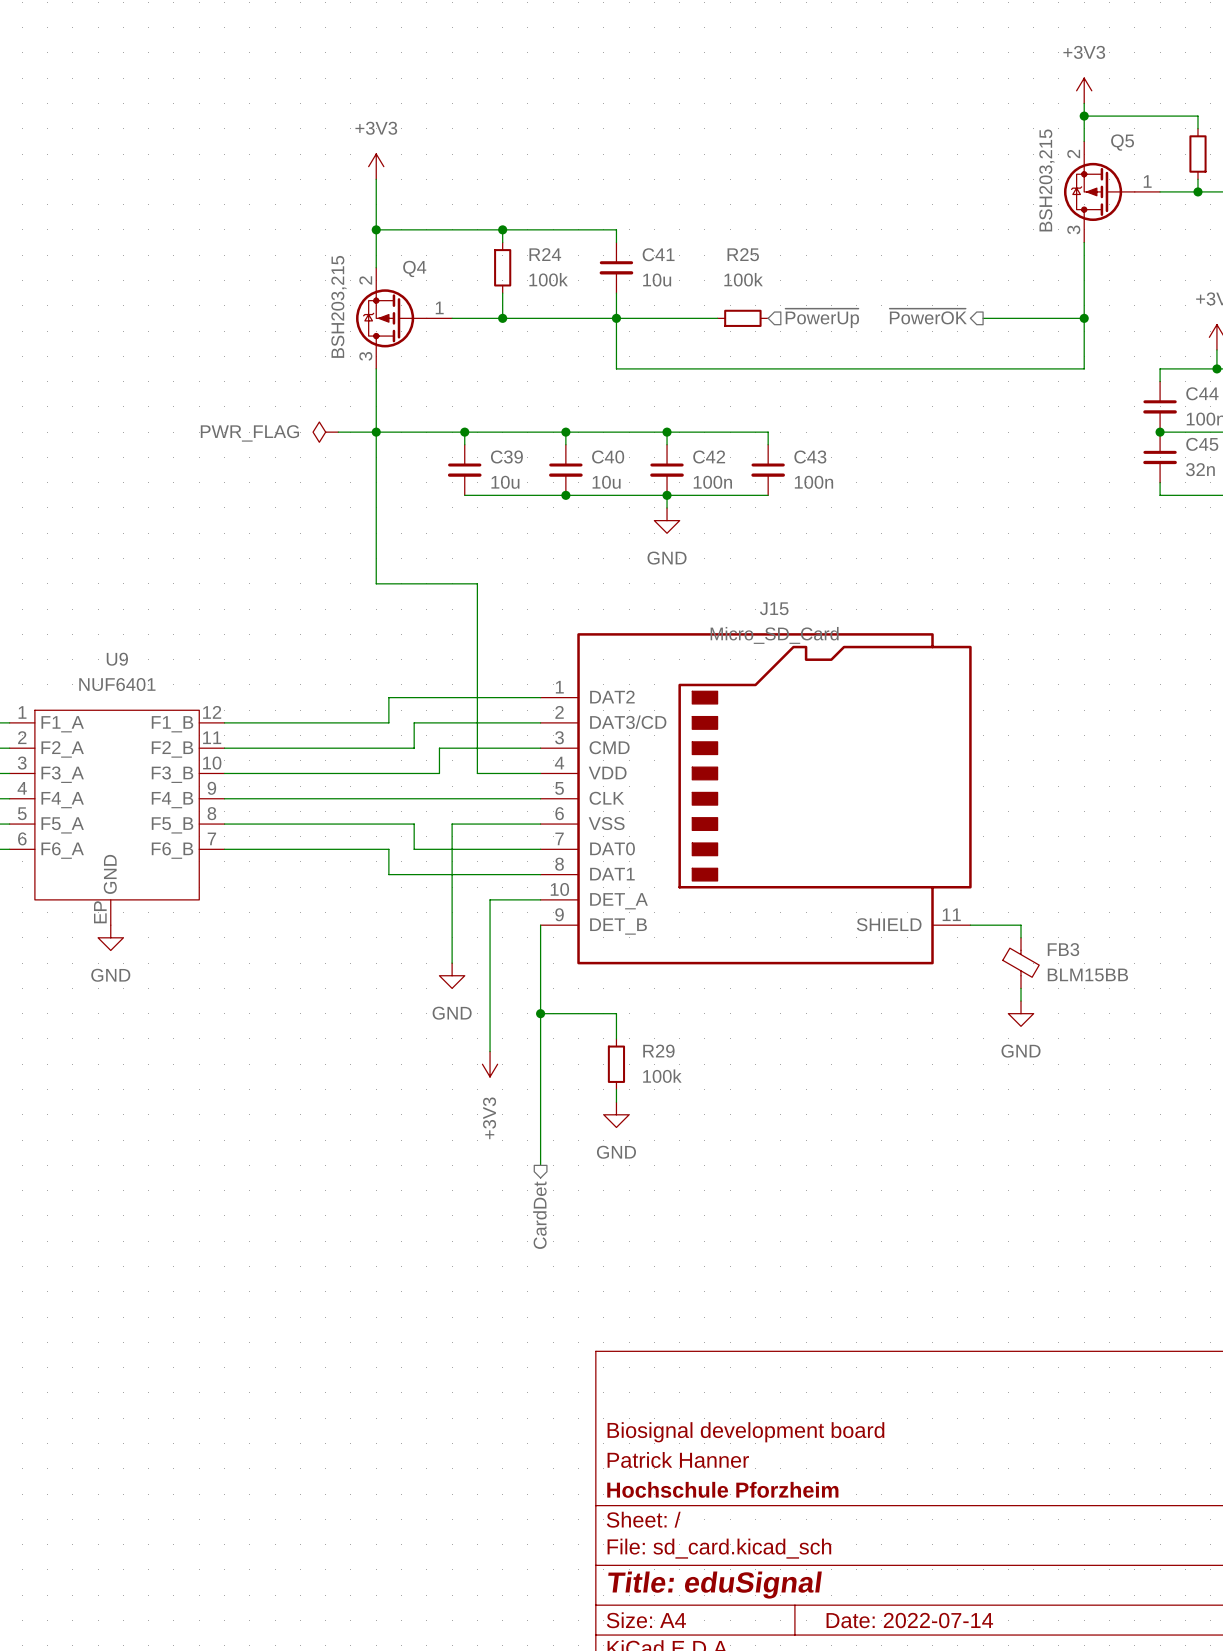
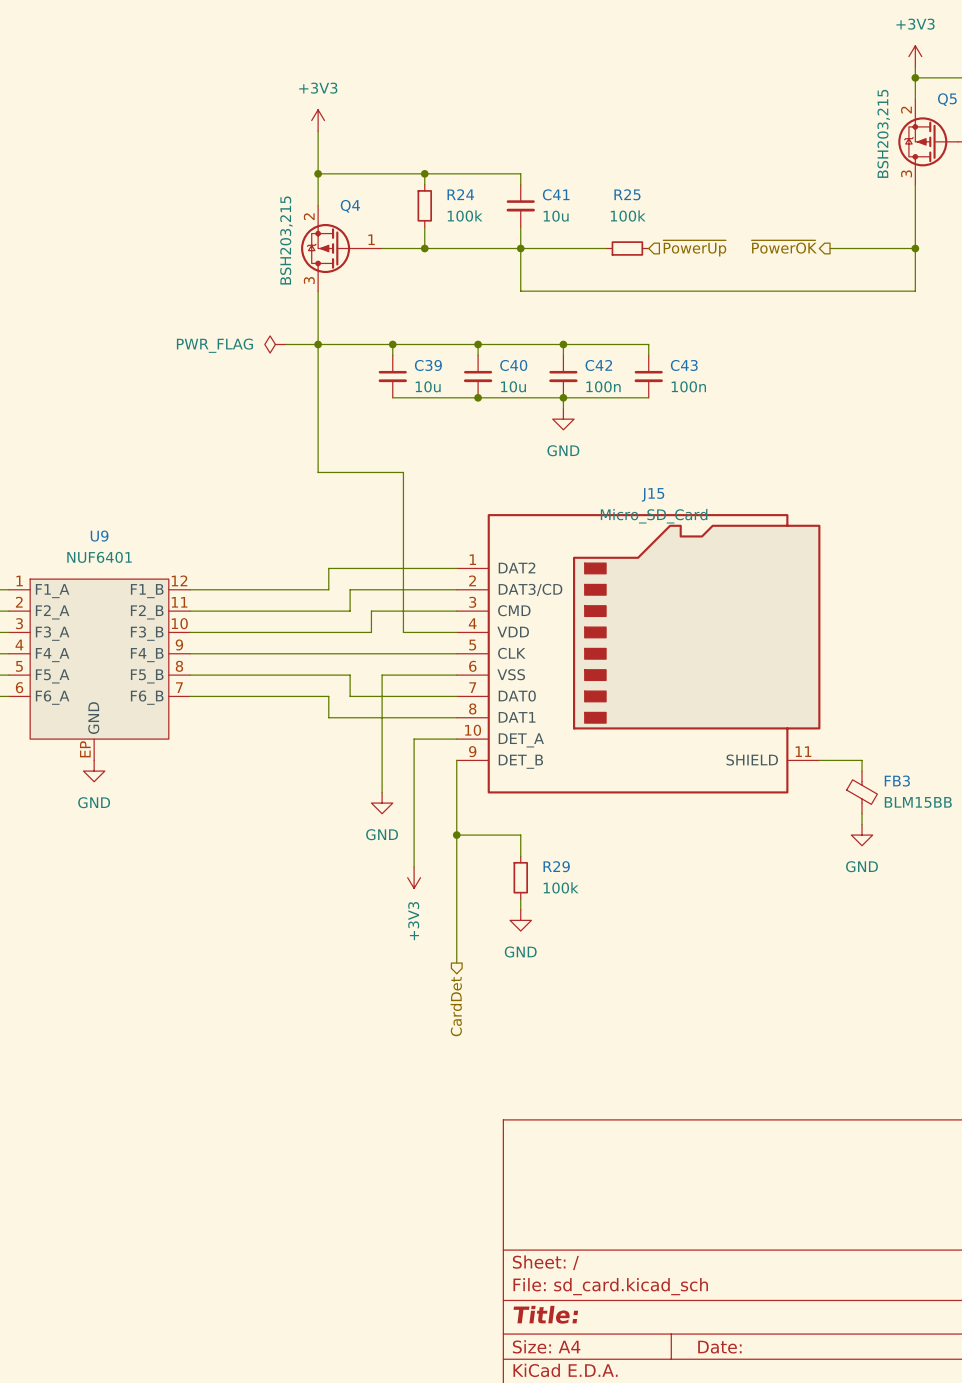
title block: Biosignal development board (745, 1432) -> none
title block: Patrick Hanner (678, 1459) -> none
title block: Hochschule Pforzheim (722, 1489) -> none
title block: Title: eduSignal (715, 1585) -> Title: (545, 1314)
title block: Date: 2022-07-14 (909, 1620) -> Date: (719, 1347)

